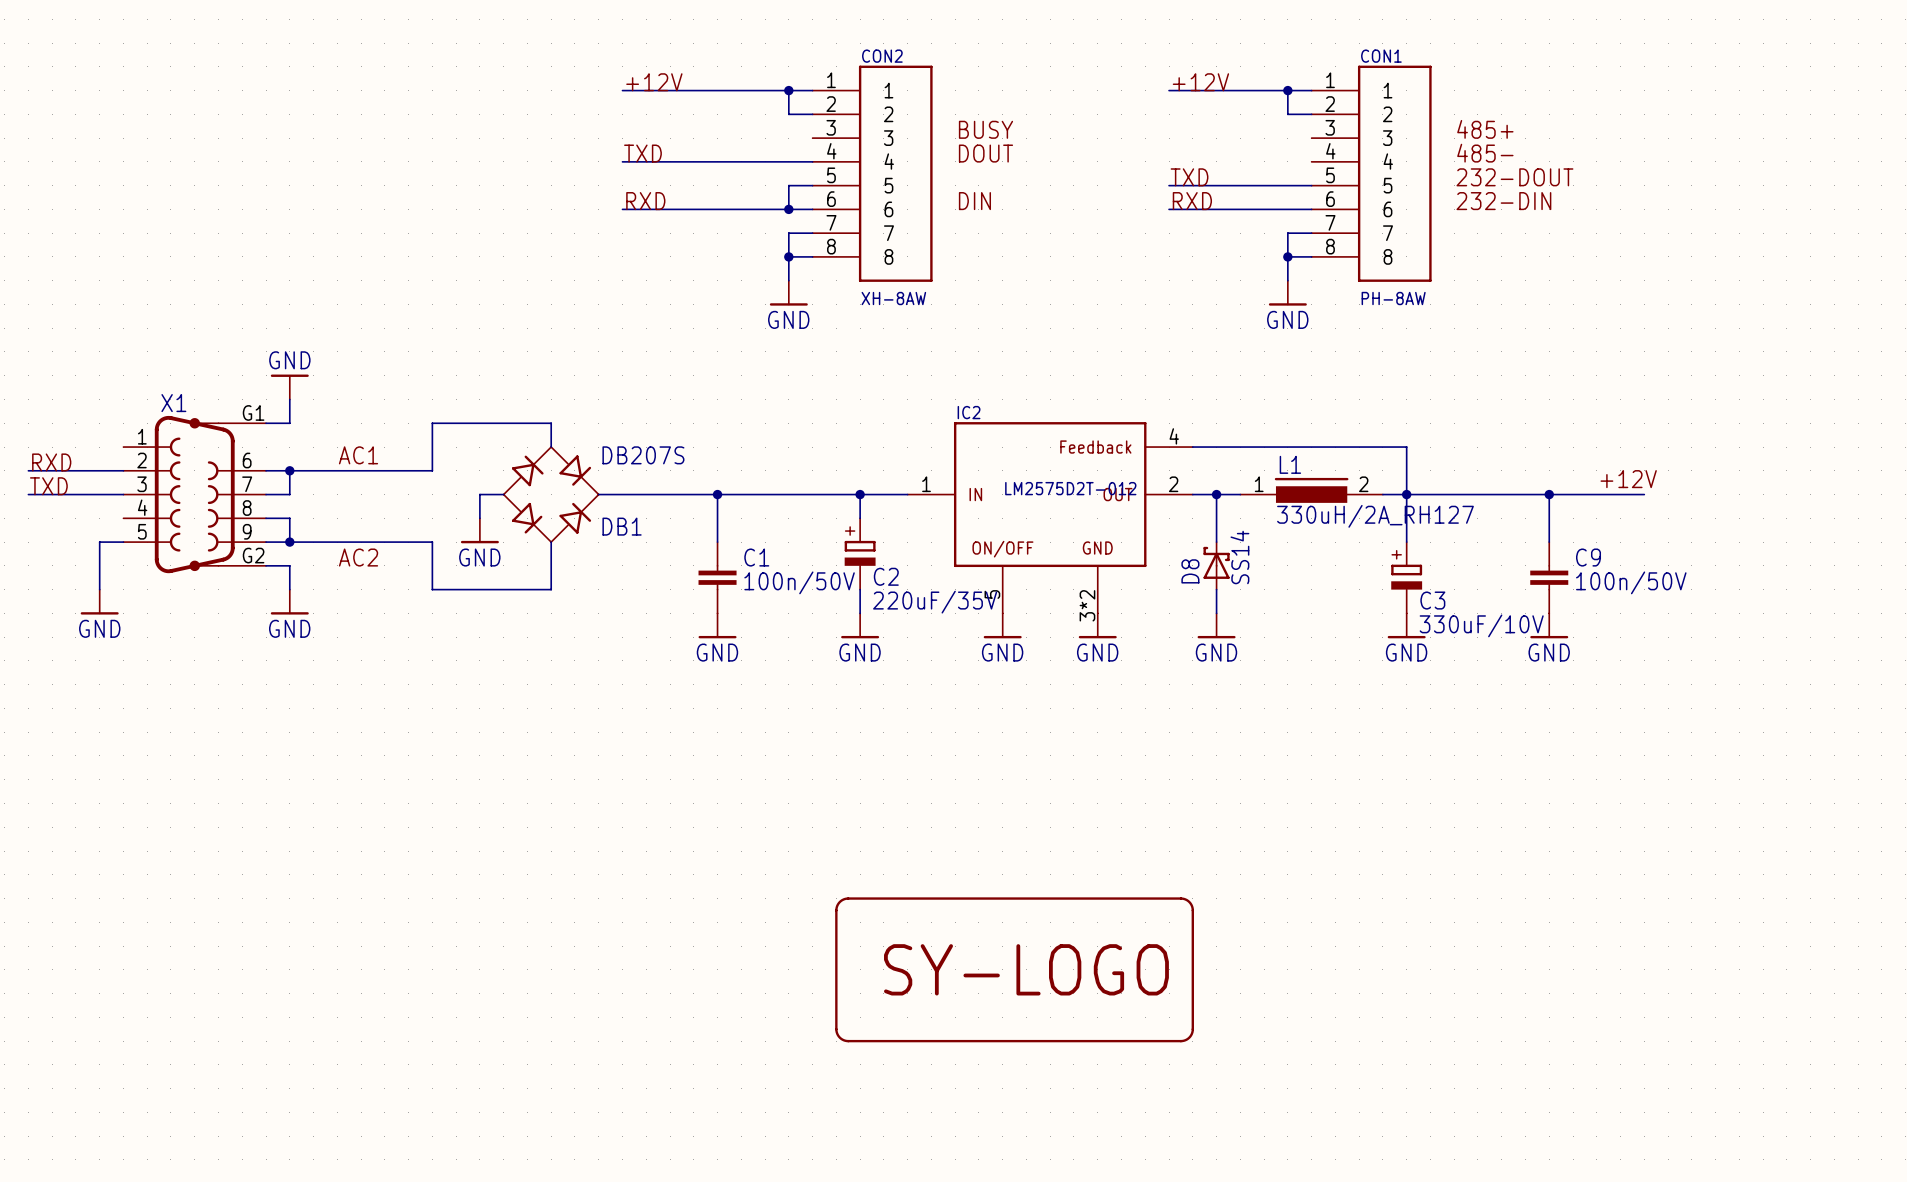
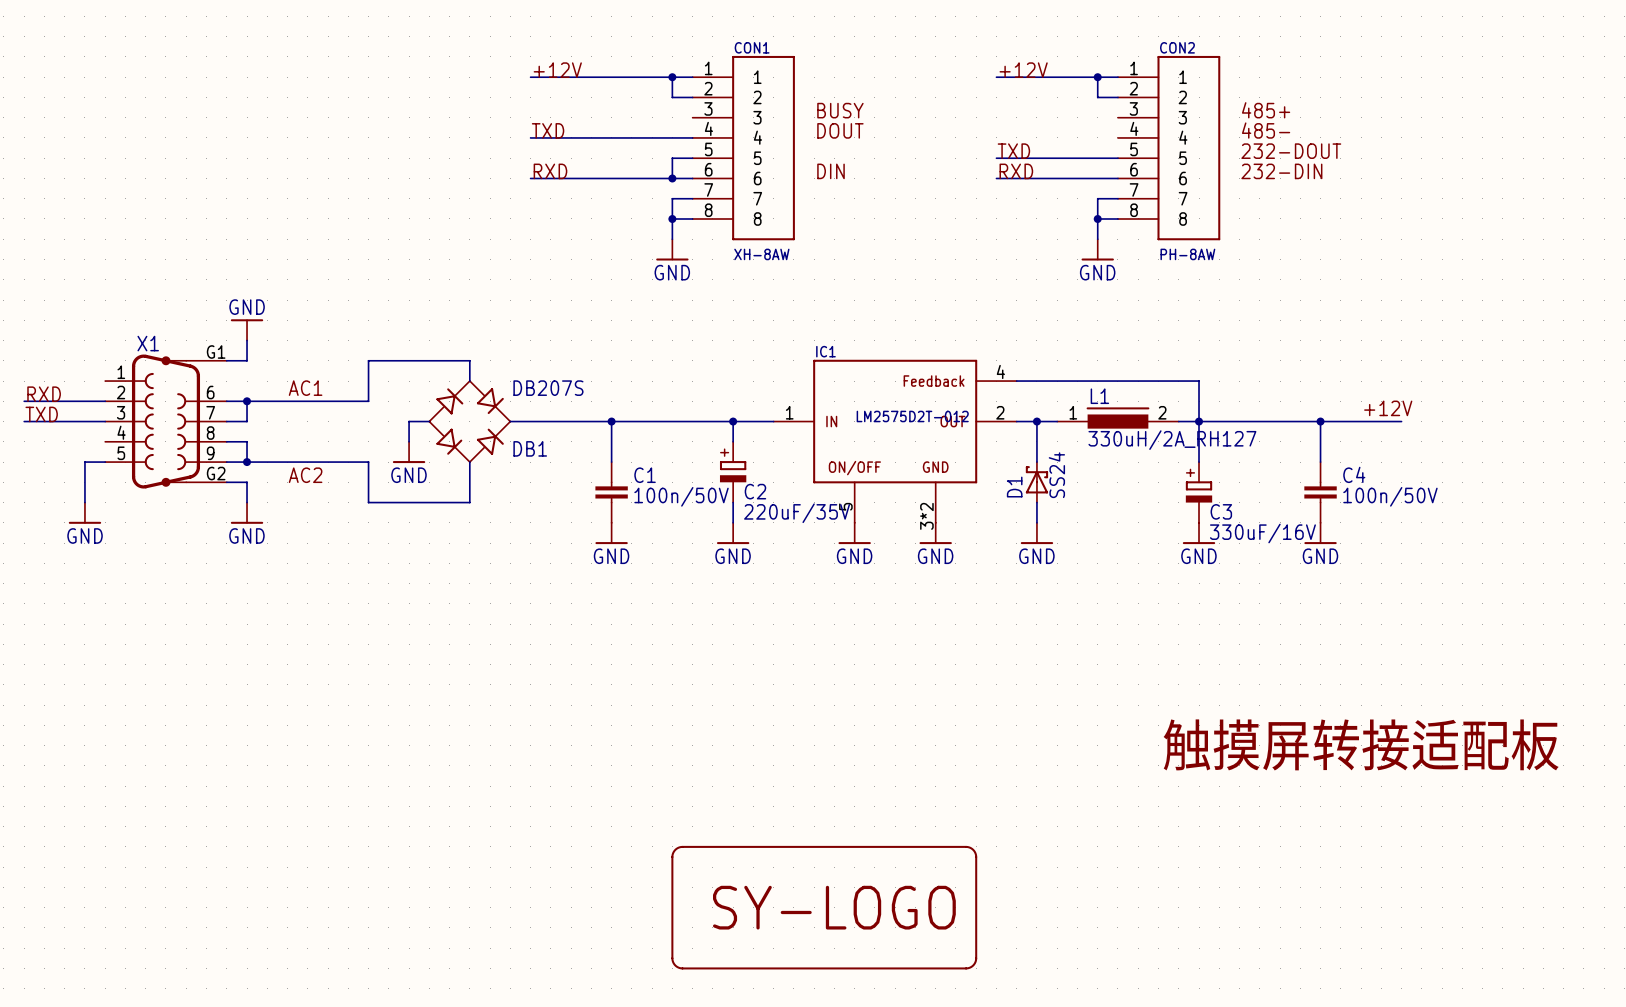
CON2 name: CON2 (882, 56) -> CON1 (752, 47)
CON1 name: CON1 (1381, 56) -> CON2 (1177, 47)
IC2 name: IC2 (969, 412) -> IC1 (825, 351)
D8 value: SS14 (1239, 557) -> SS24 (1056, 475)
C9 name: C9 (1588, 557) -> C4 (1354, 474)
D8 name: D8 (1190, 571) -> D1 (1014, 487)
C3 value: 330uF/10V (1481, 625) -> 330uF/16V (1262, 533)
text: none -> 触摸屏转接适配板 (1361, 744)
part position: (1014, 969) -> (824, 907)

